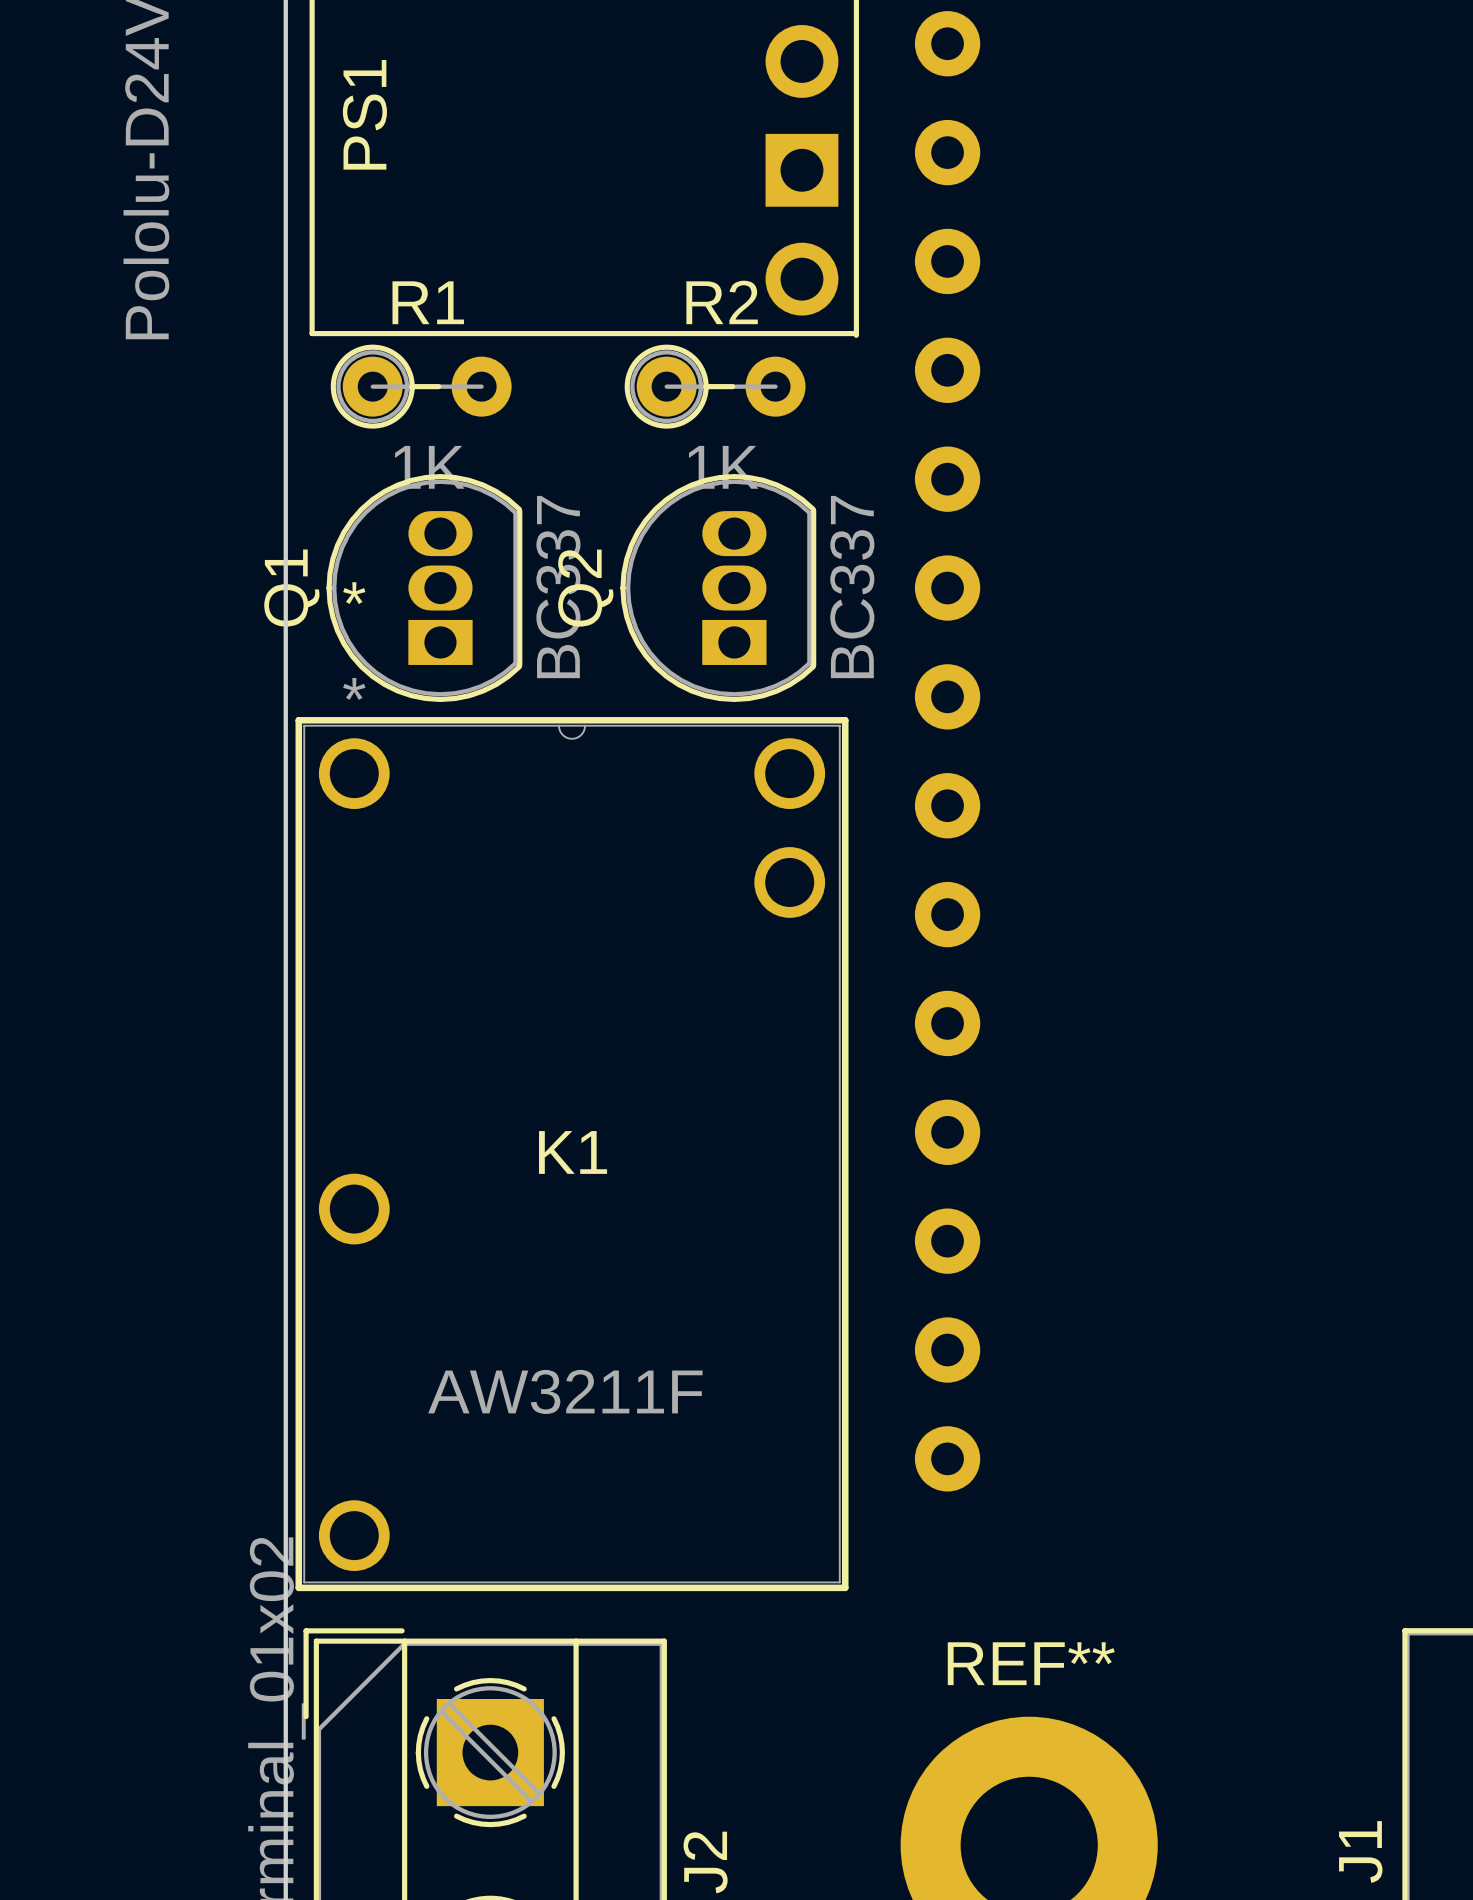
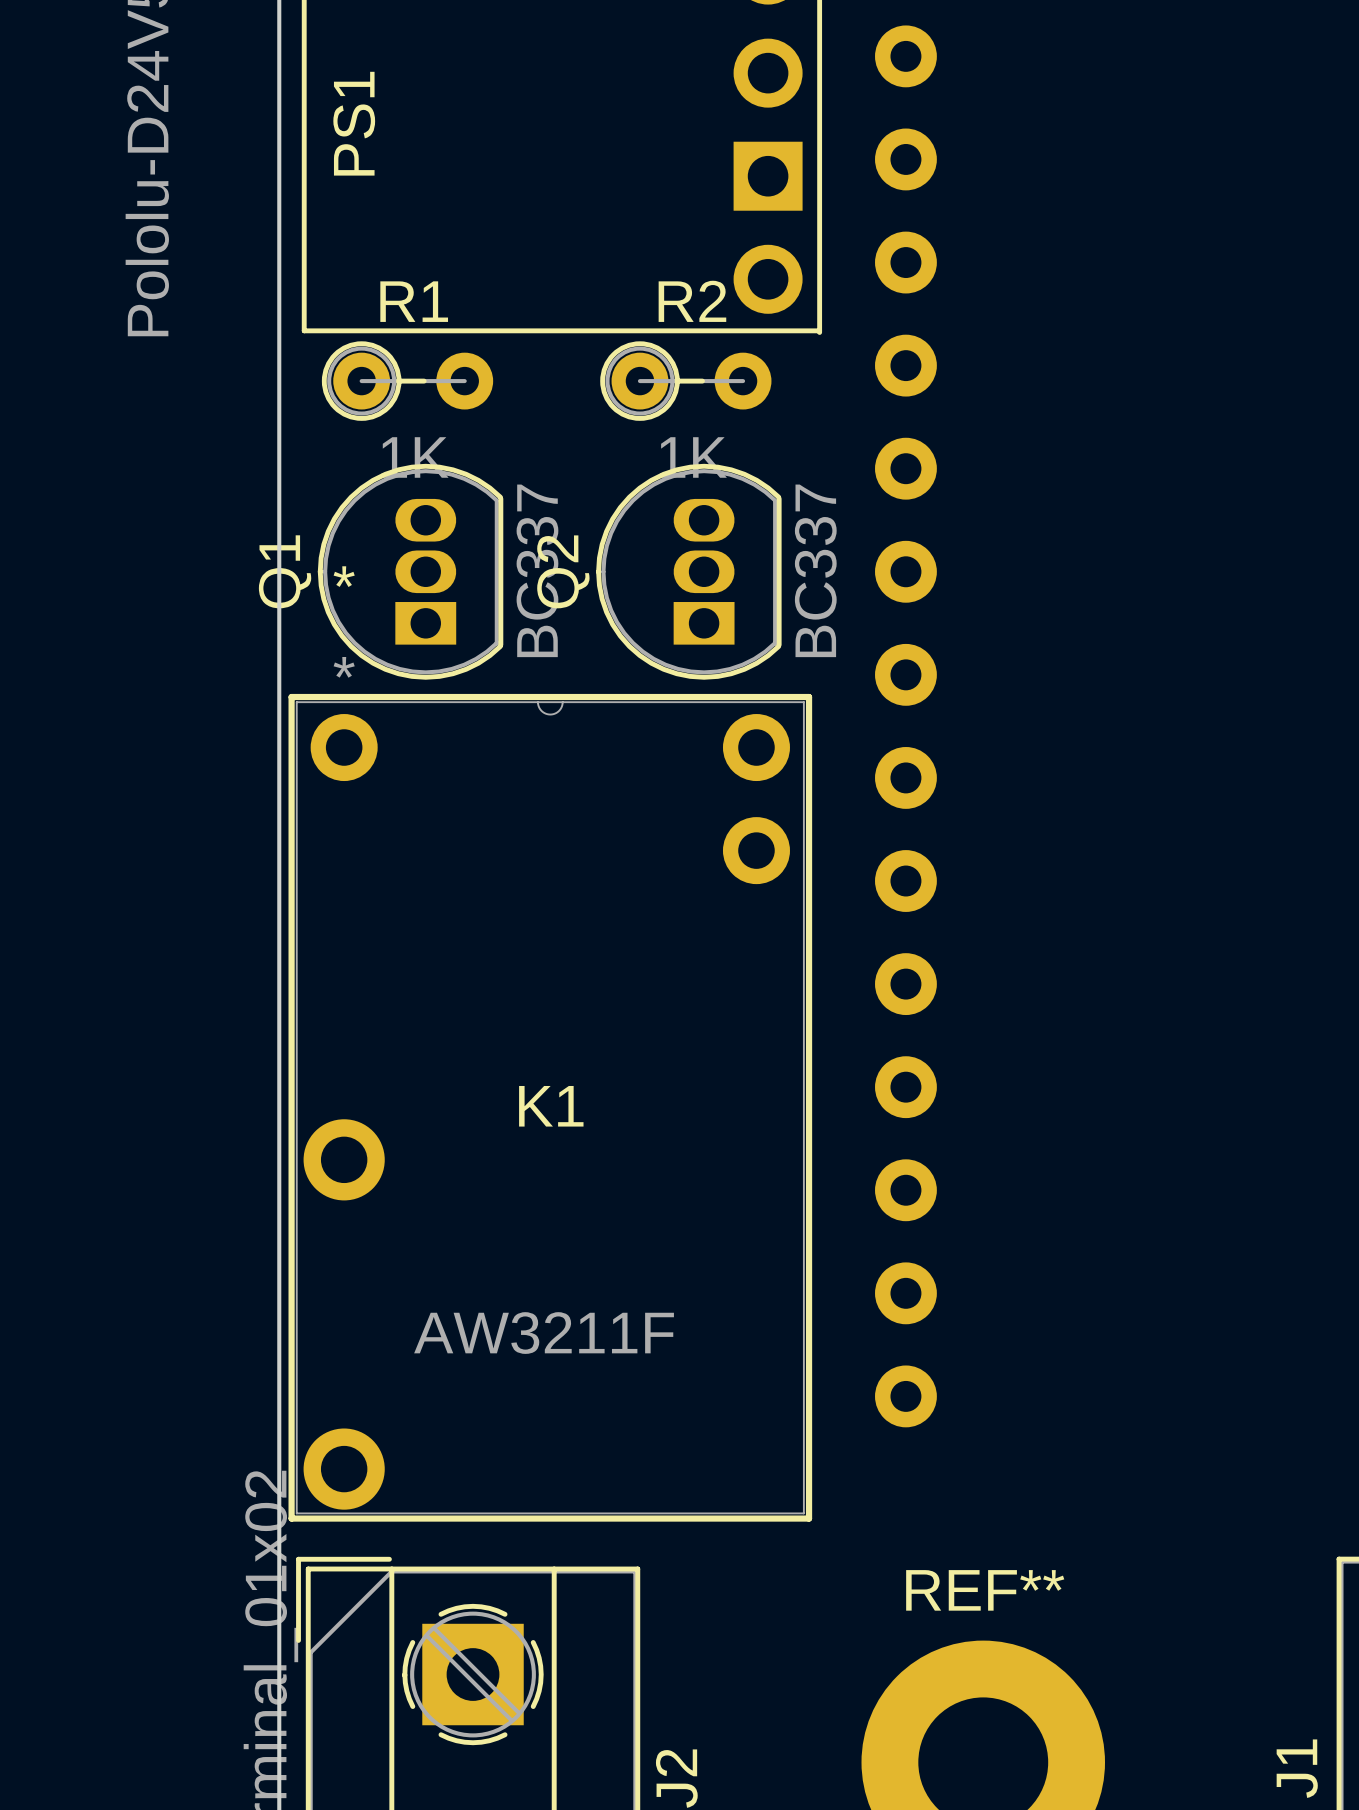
K1 footprint: [295, 717, 849, 1592] -> [288, 693, 813, 1522]

